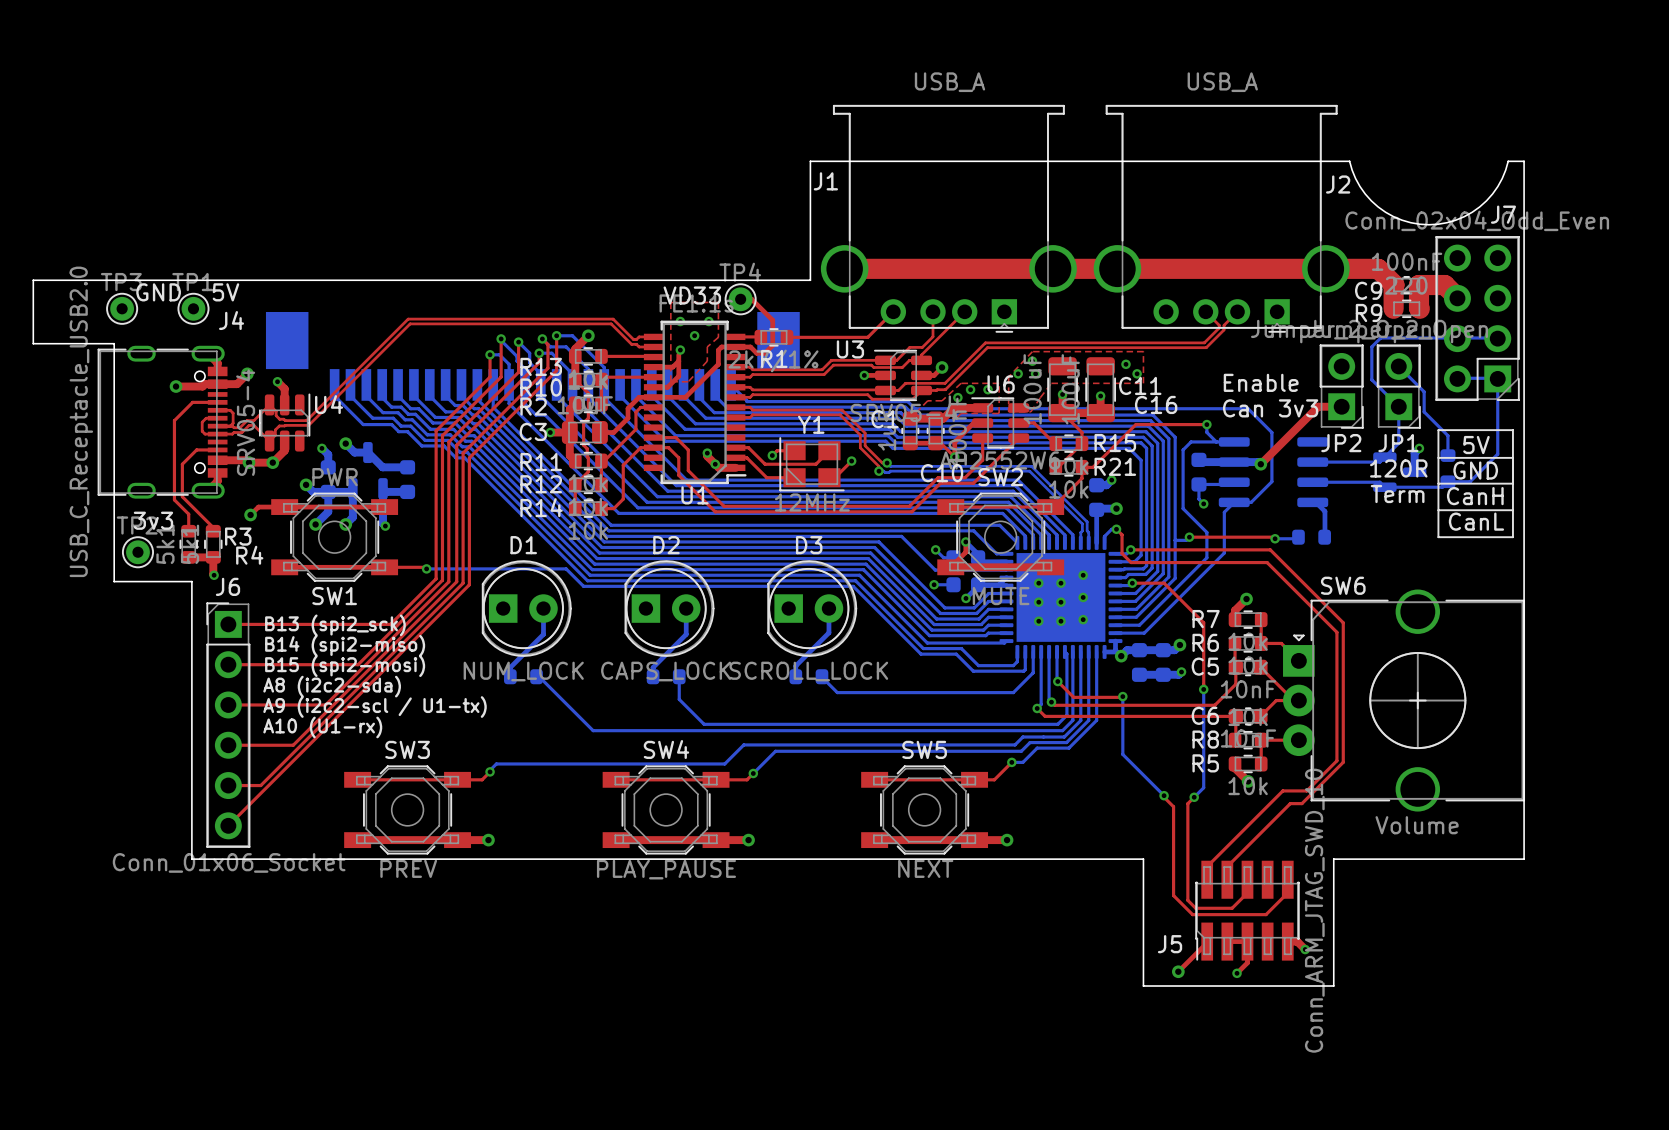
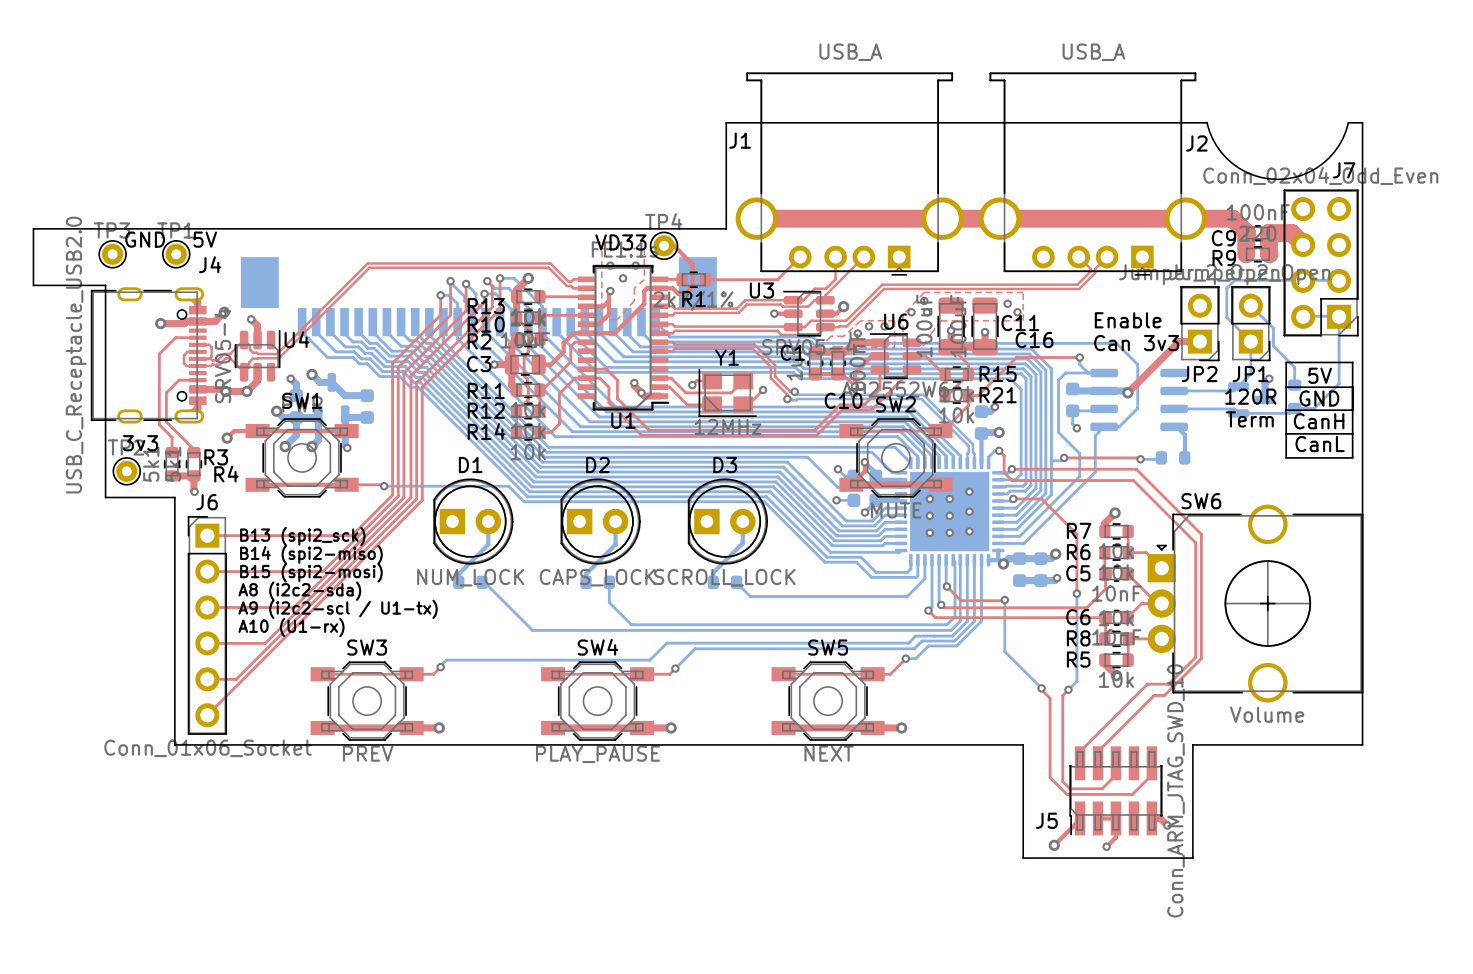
SW1 name position: SW1 (334, 596) -> SW1 (302, 400)

